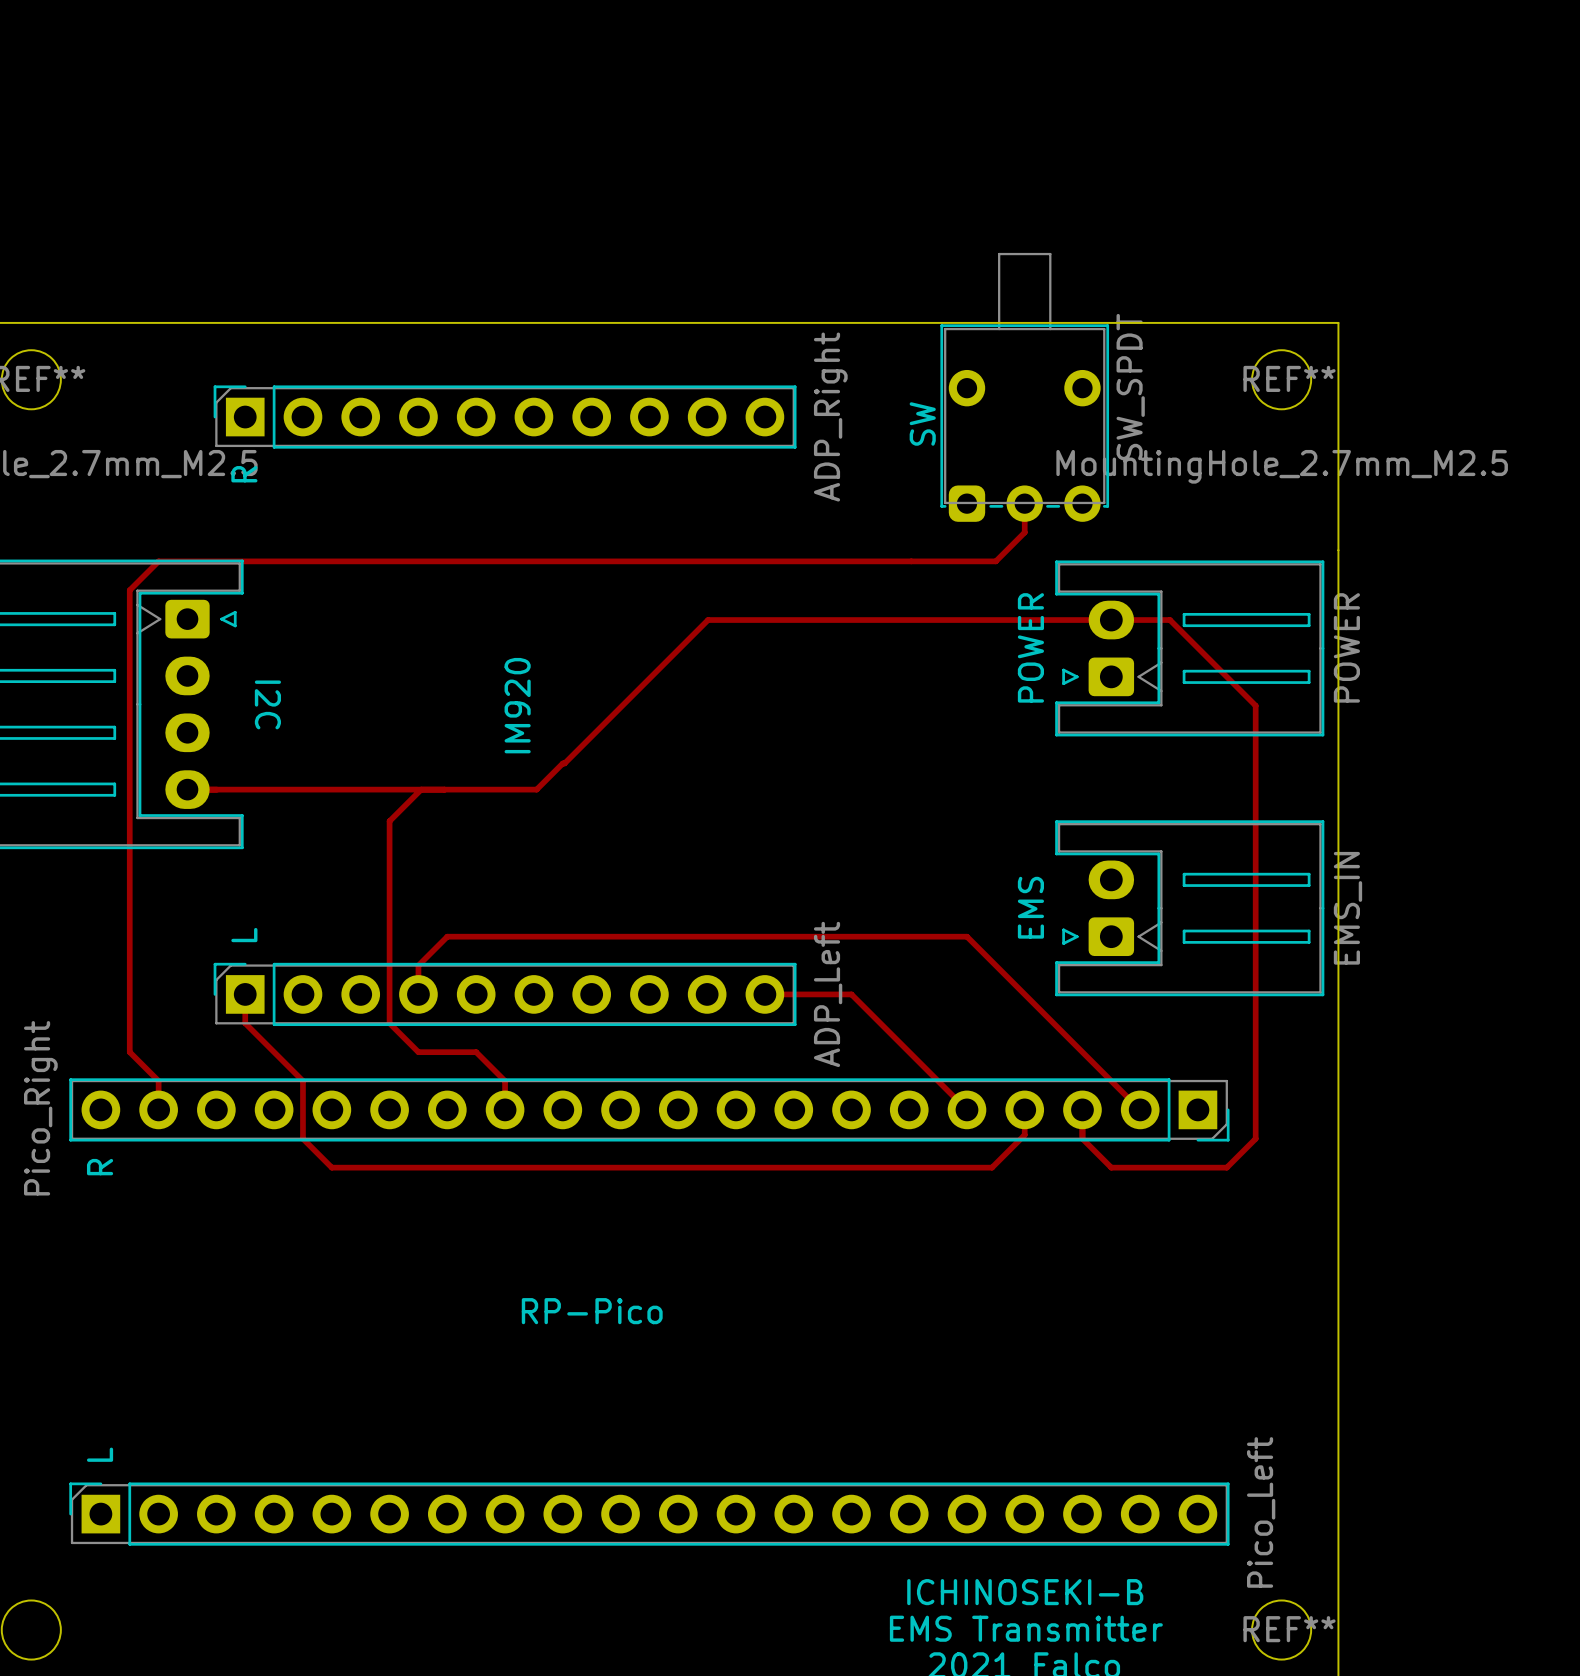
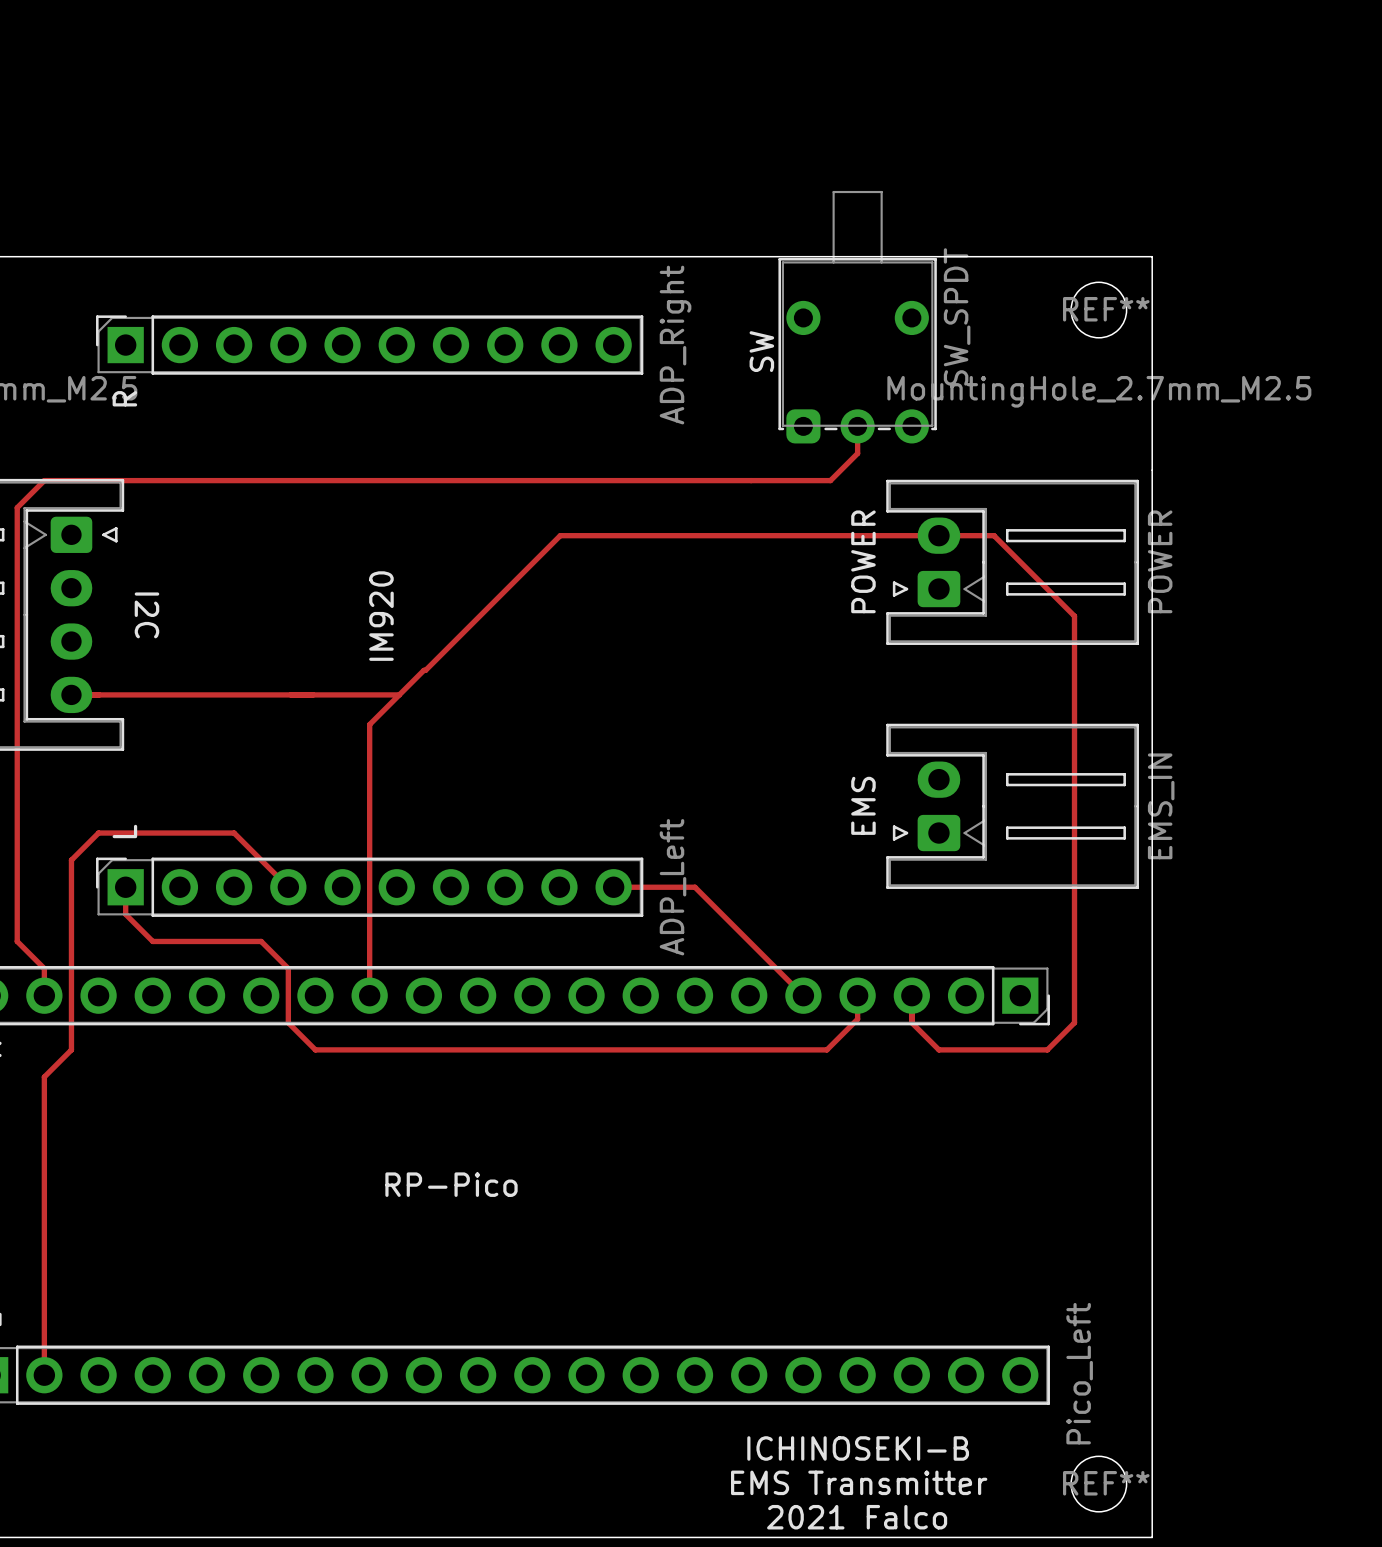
track: (421, 789) (389, 821) (389, 1023) (418, 1052) (476, 1052) (505, 1081) -> (399, 694) (369, 724) (369, 968)
track: (418, 994) (418, 965) (447, 936) (966, 936) (1140, 1109) -> (288, 887) (234, 833) (98, 833) (71, 860) (71, 1049) (44, 1077) (44, 1375)
track: (274, 1052) (302, 1081) (302, 1138) (331, 1167) (447, 1167) -> (152, 941) (261, 941) (288, 968) (288, 1022) (315, 1049)

